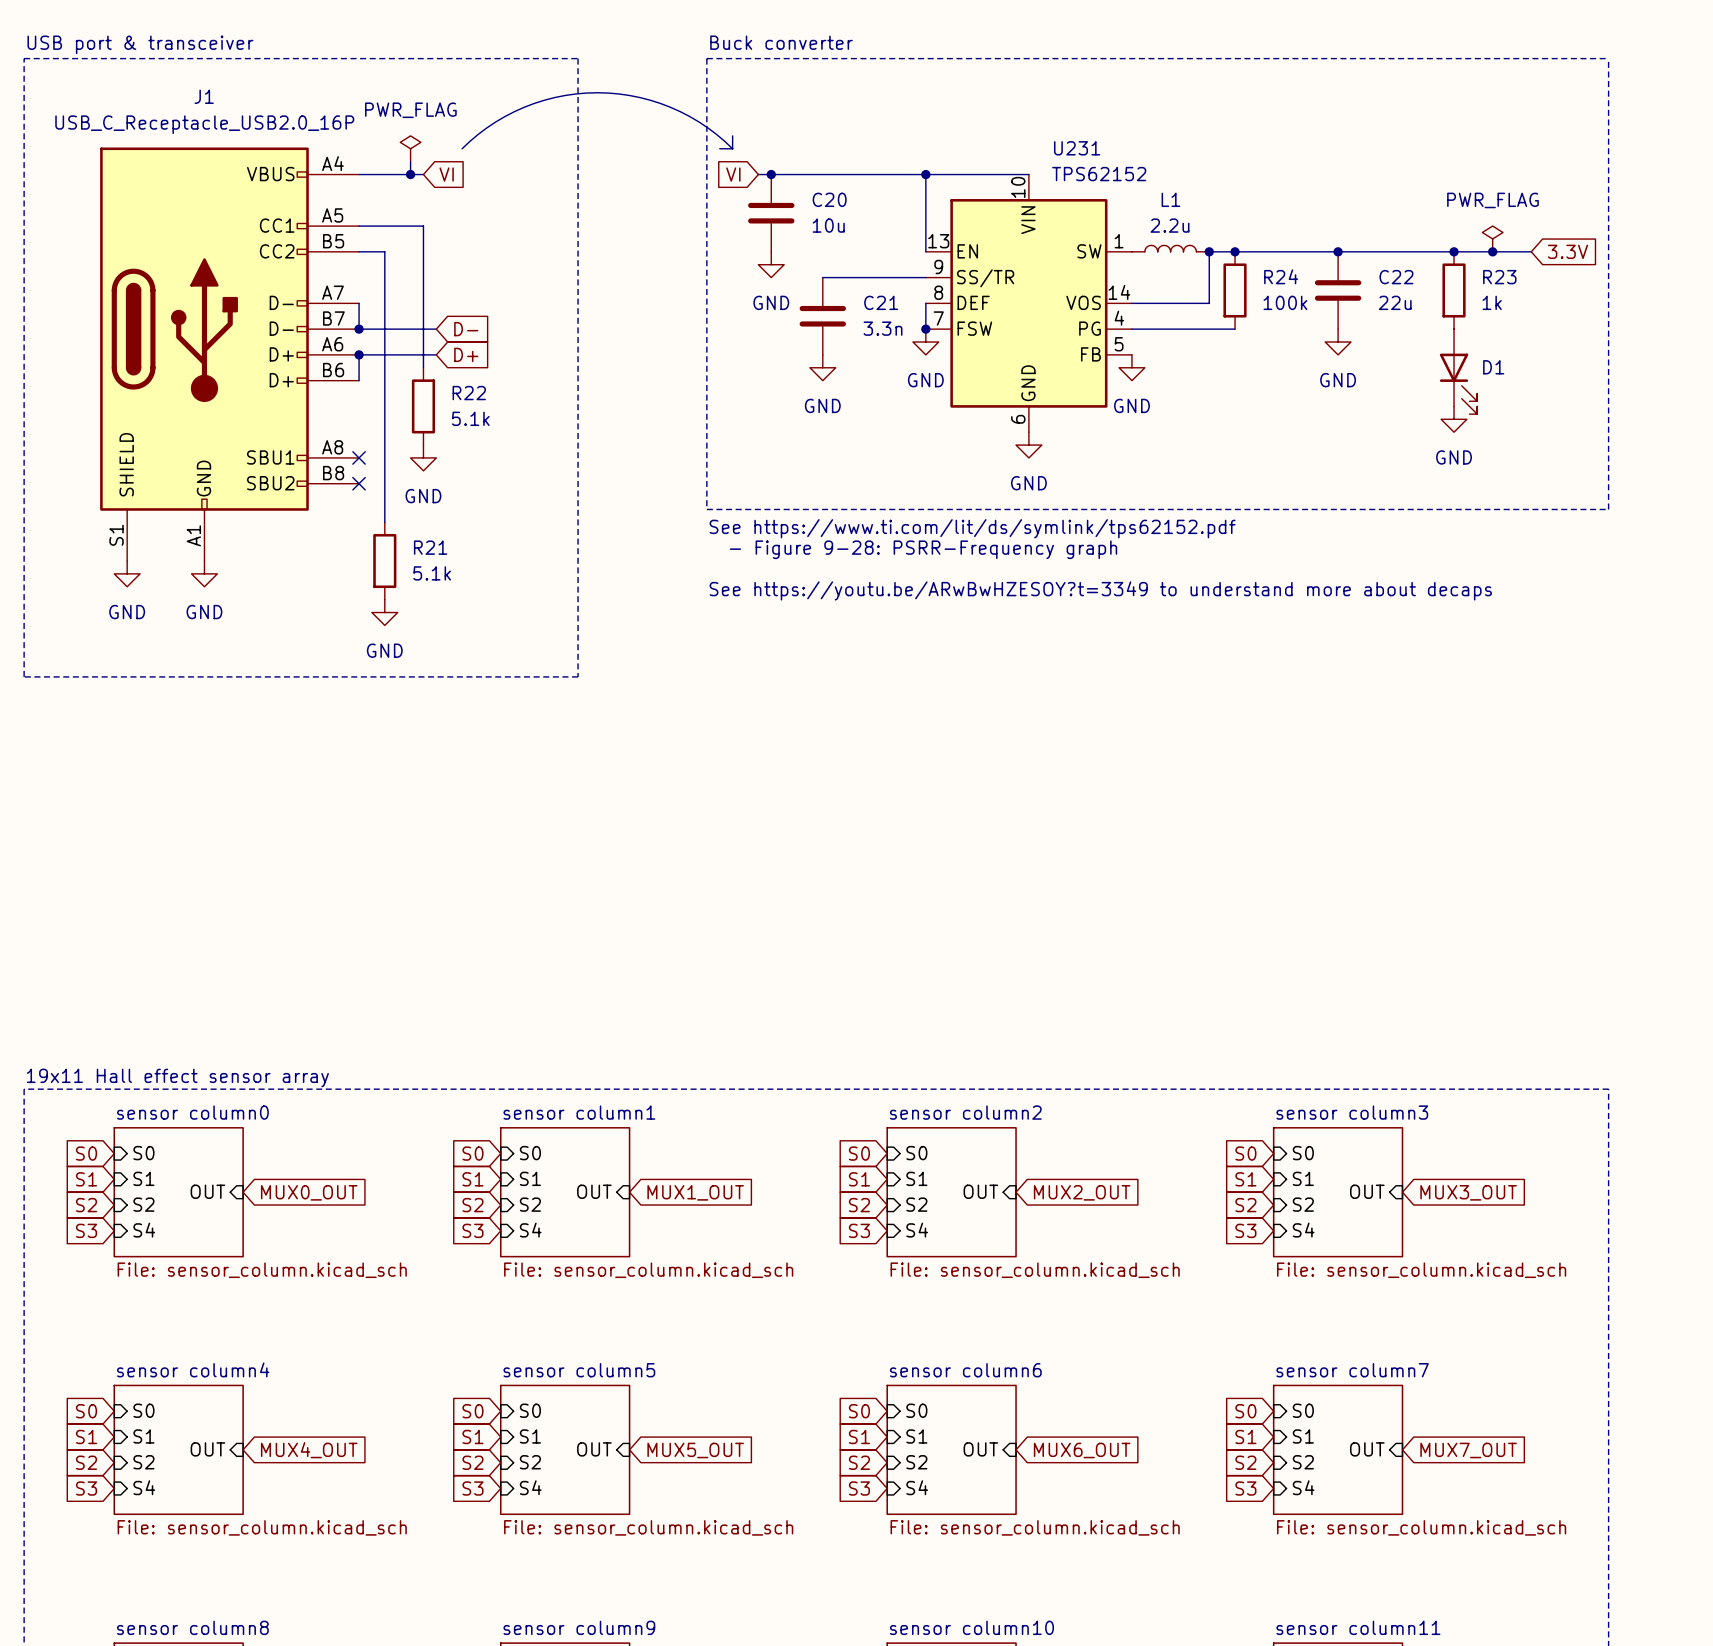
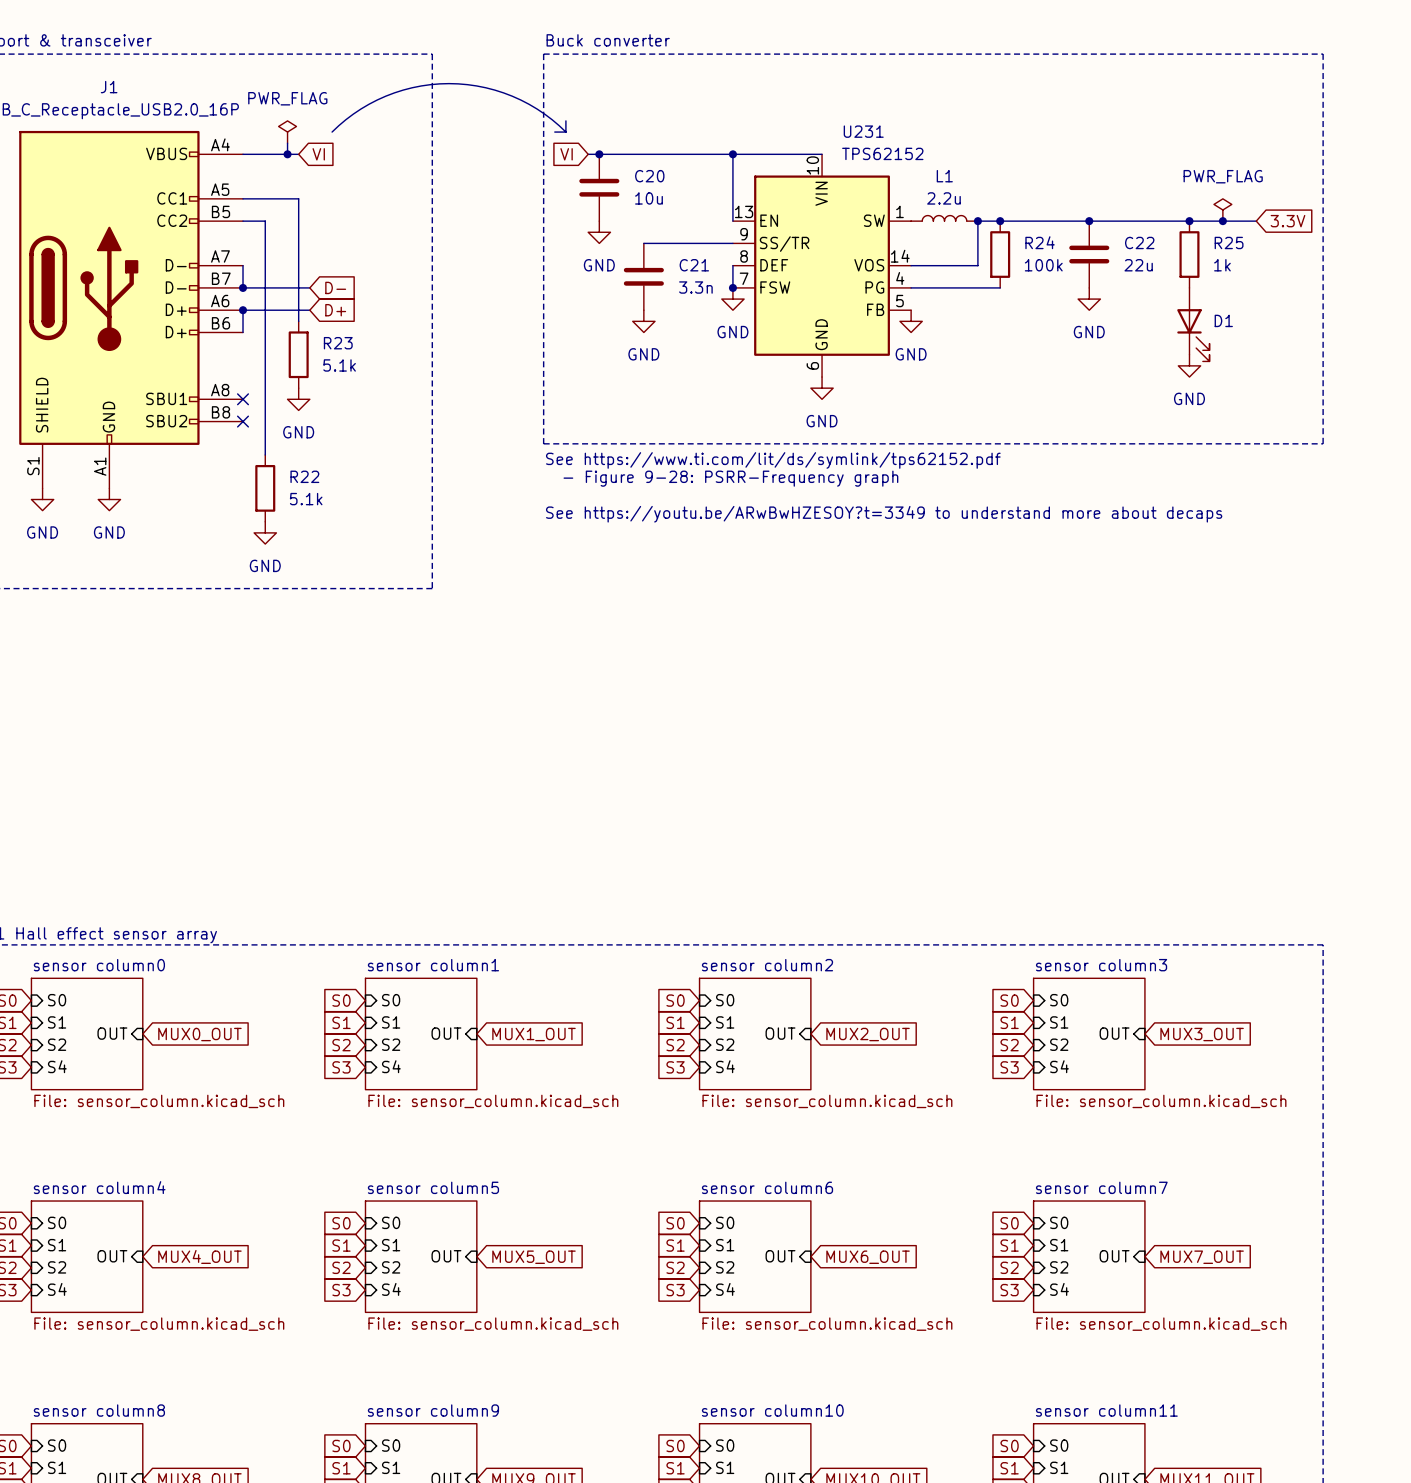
R23 name: R23 (1499, 277) -> R25 (1229, 242)
R22 name: R22 (469, 393) -> R23 (338, 343)
R21 name: R21 (430, 547) -> R22 (304, 476)

